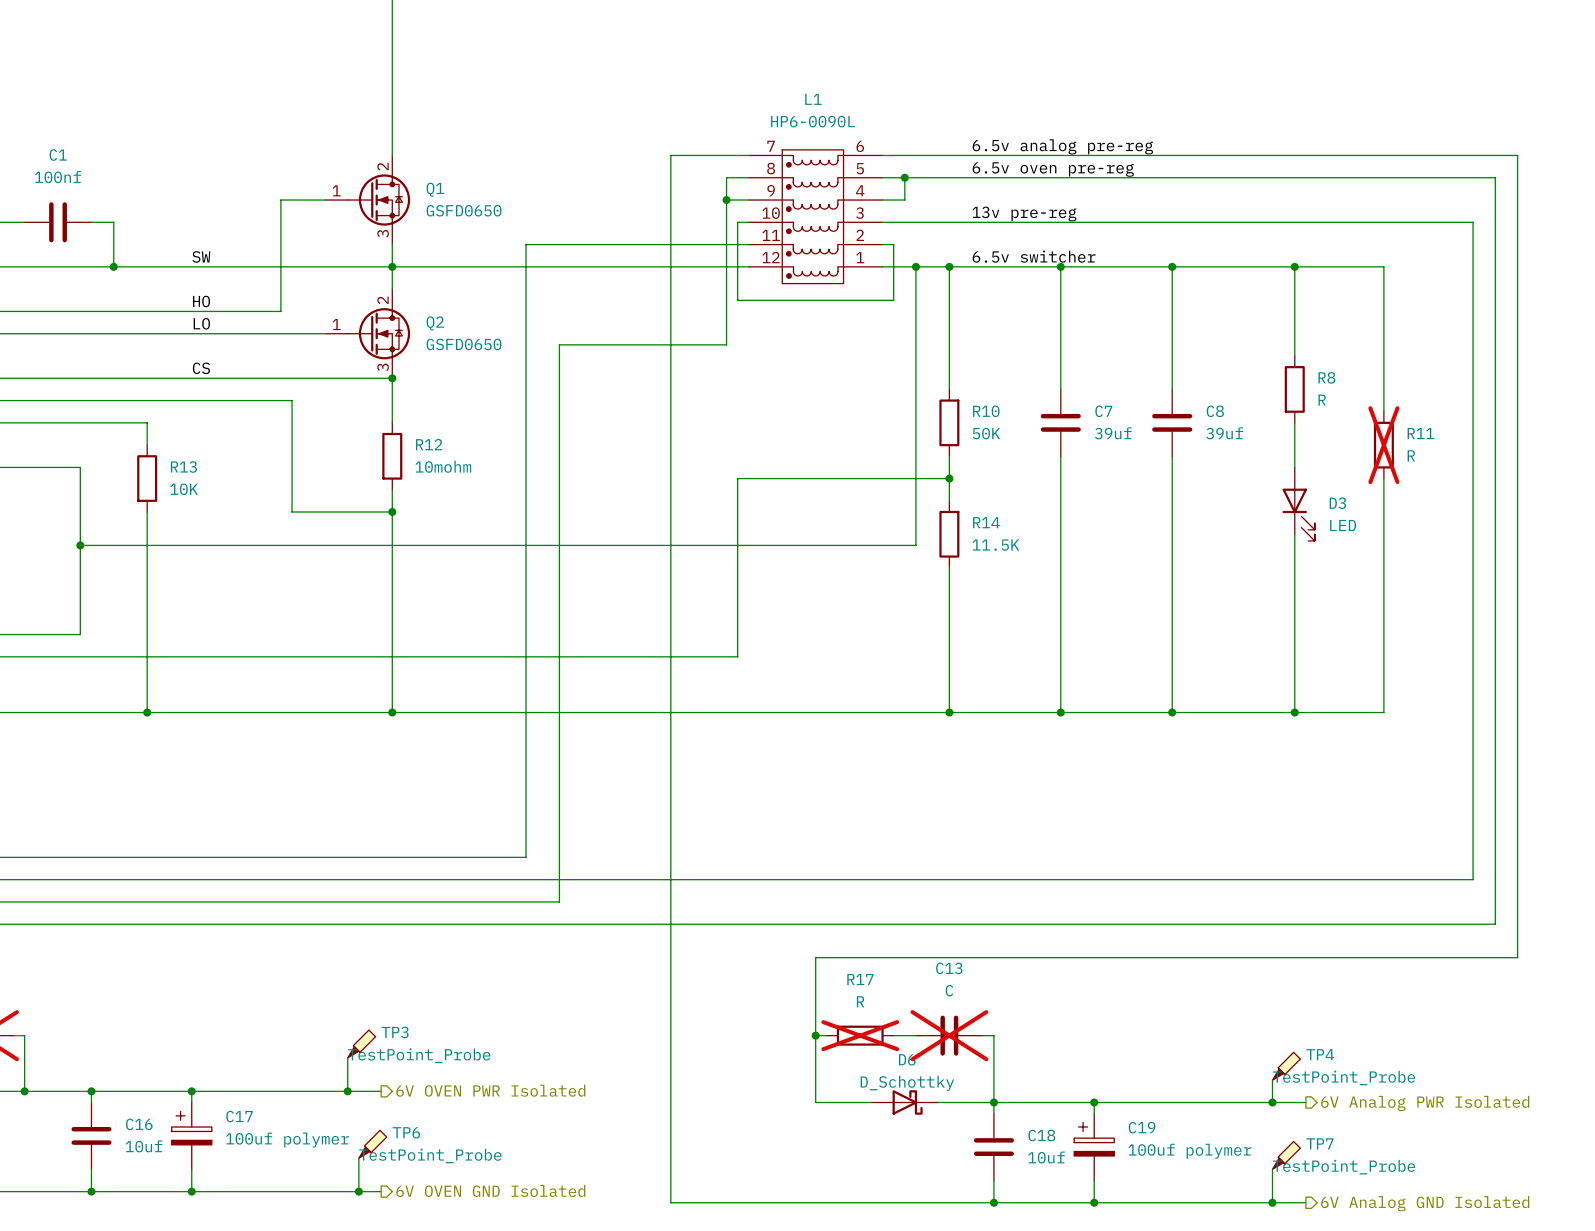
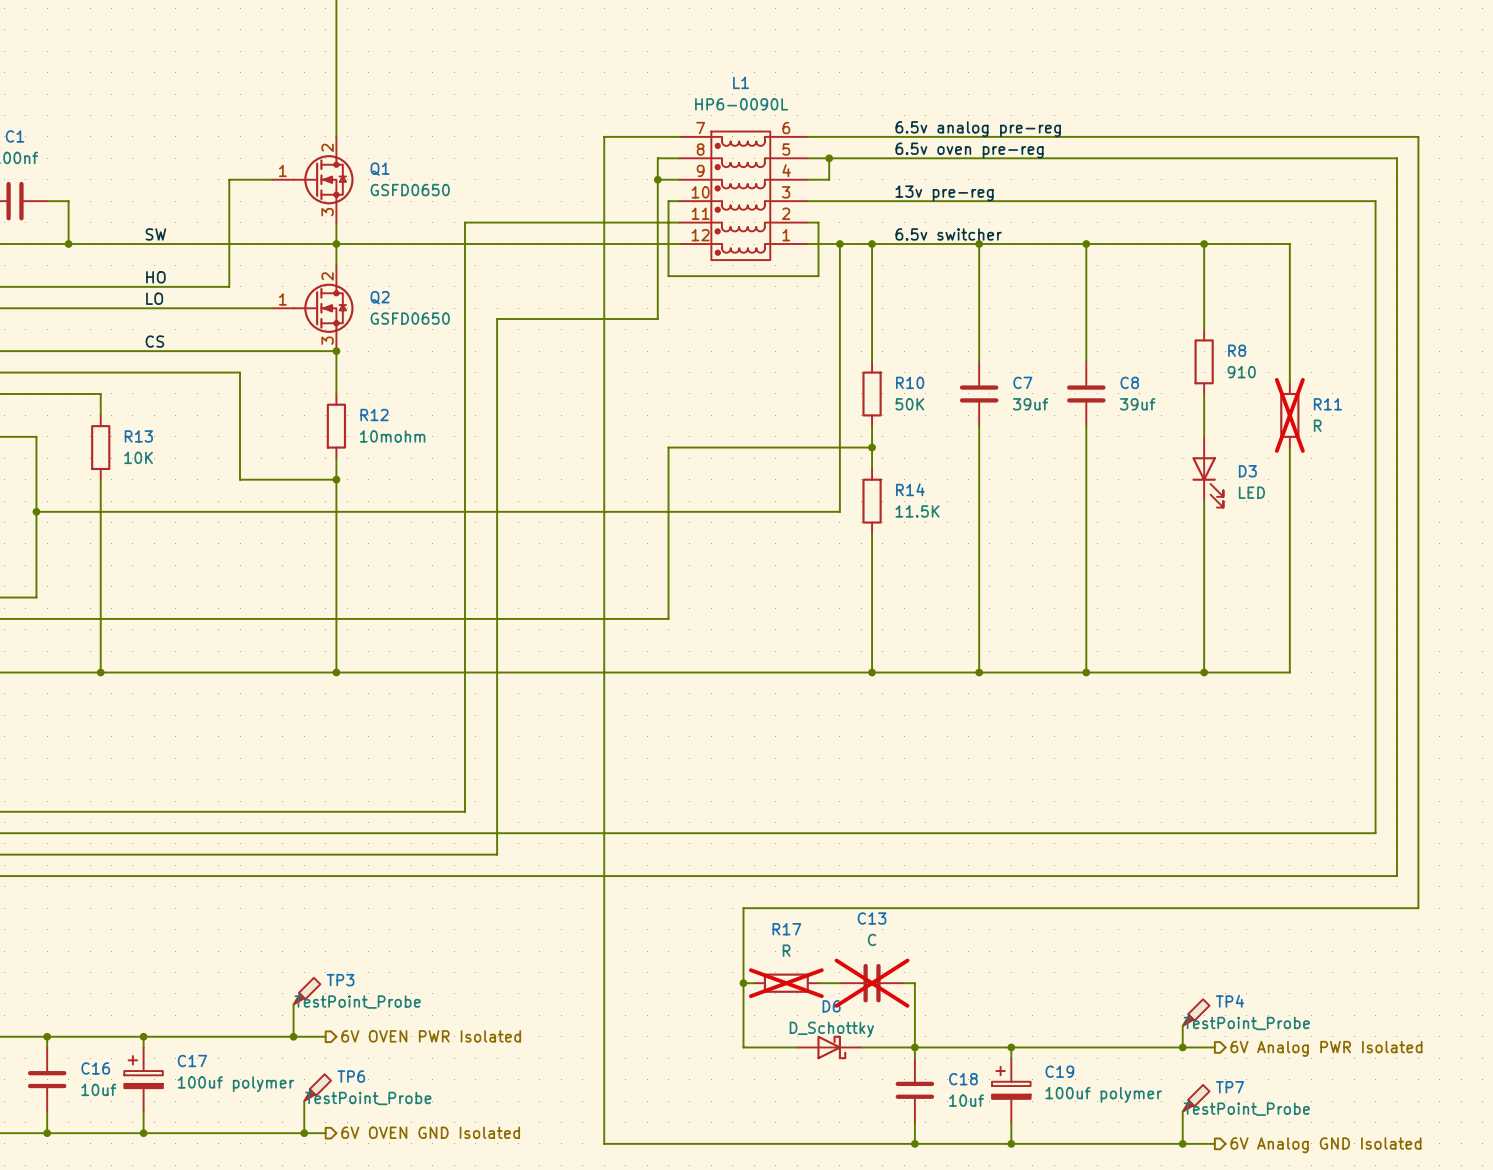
R8 value: R (1322, 400) -> 910 (1241, 372)

